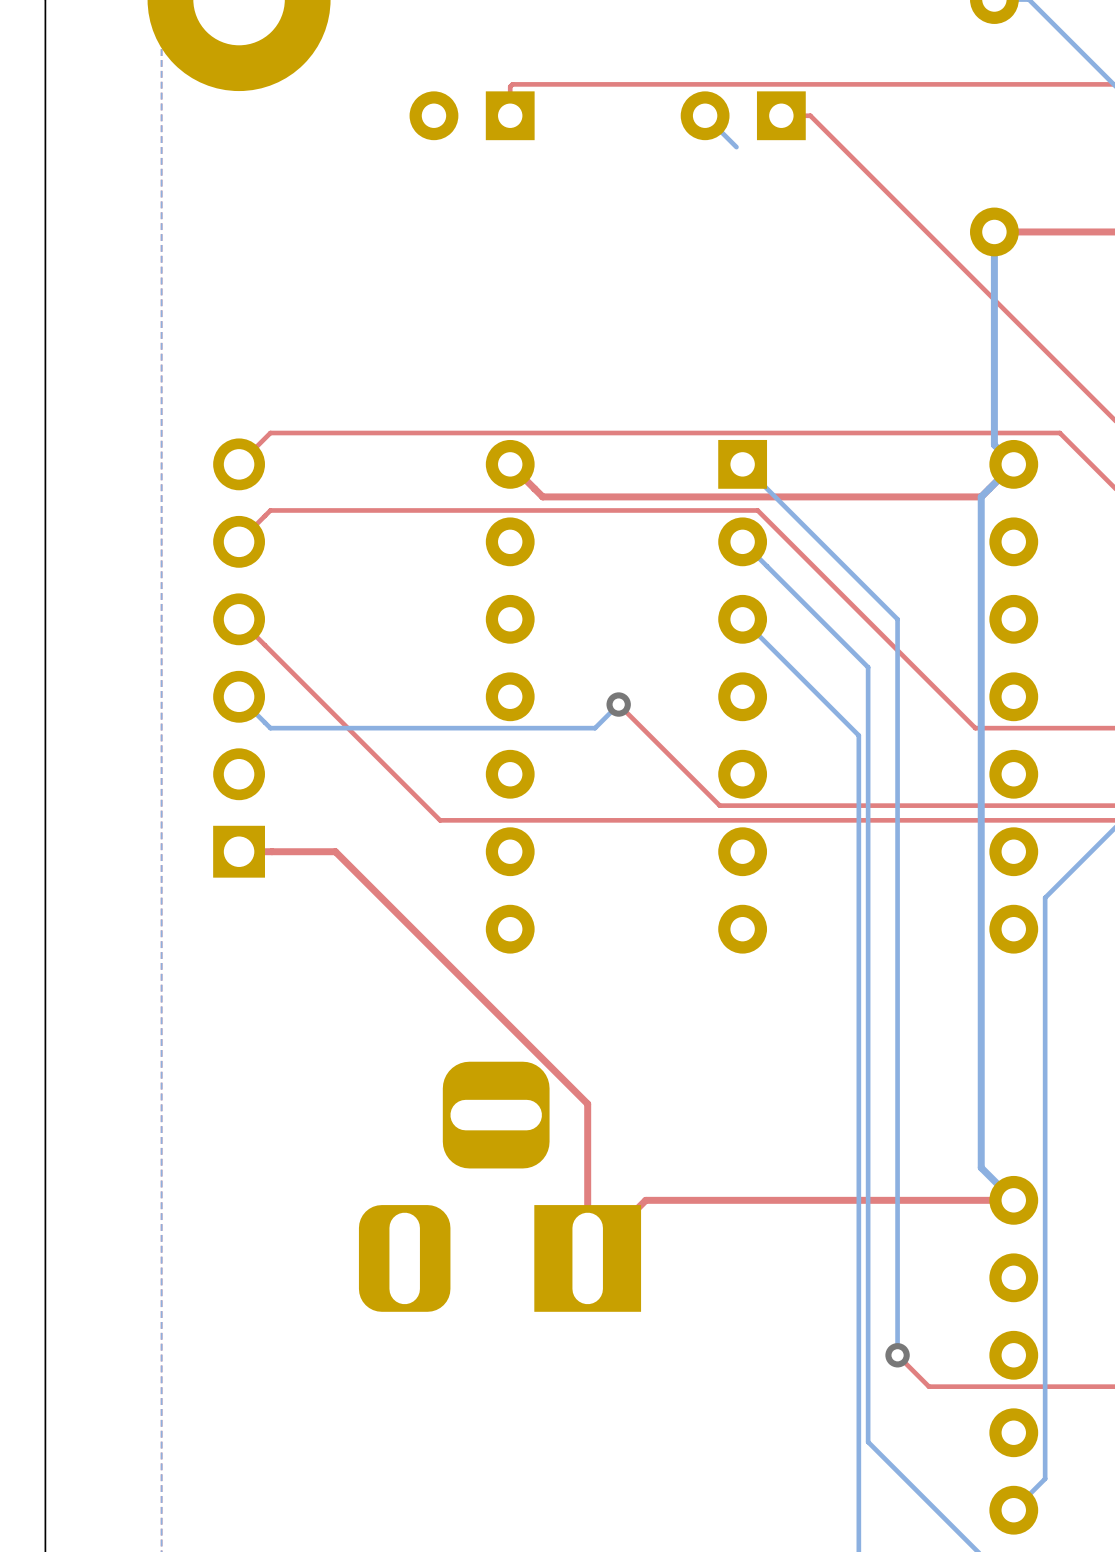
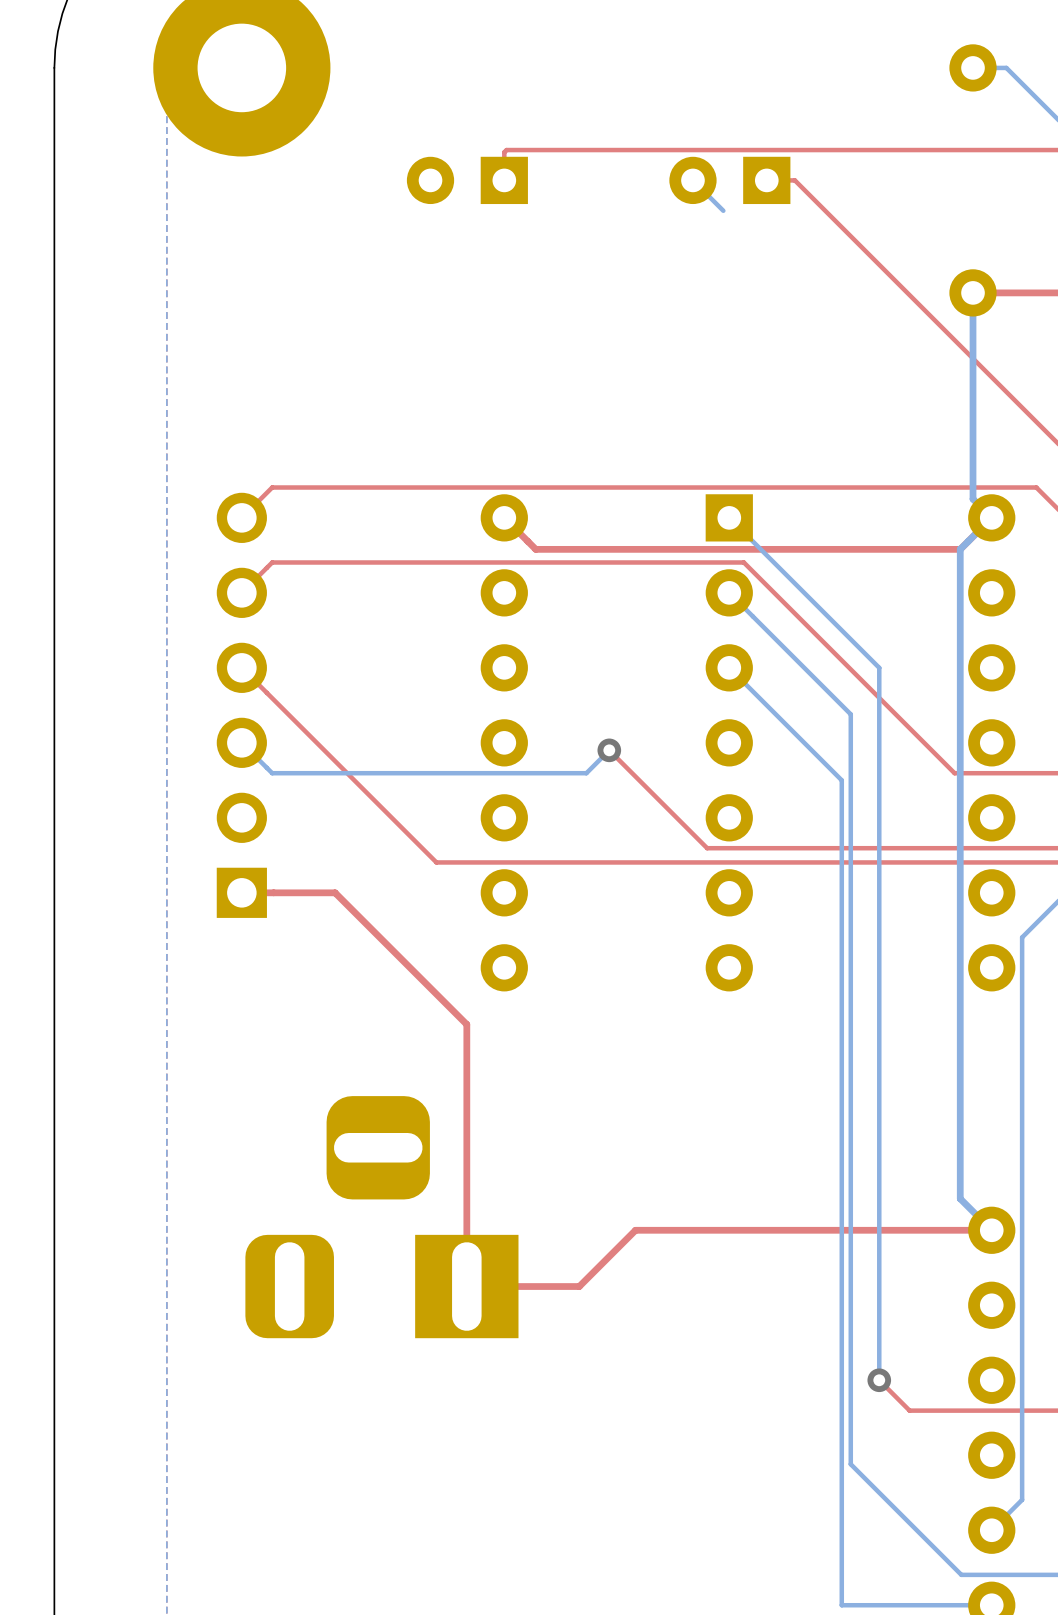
top track: (471, 987) (587, 1103) (587, 1258) -> (466, 1024) (466, 1286) (579, 1286)
part position: (500, 1186) -> (381, 1217)

